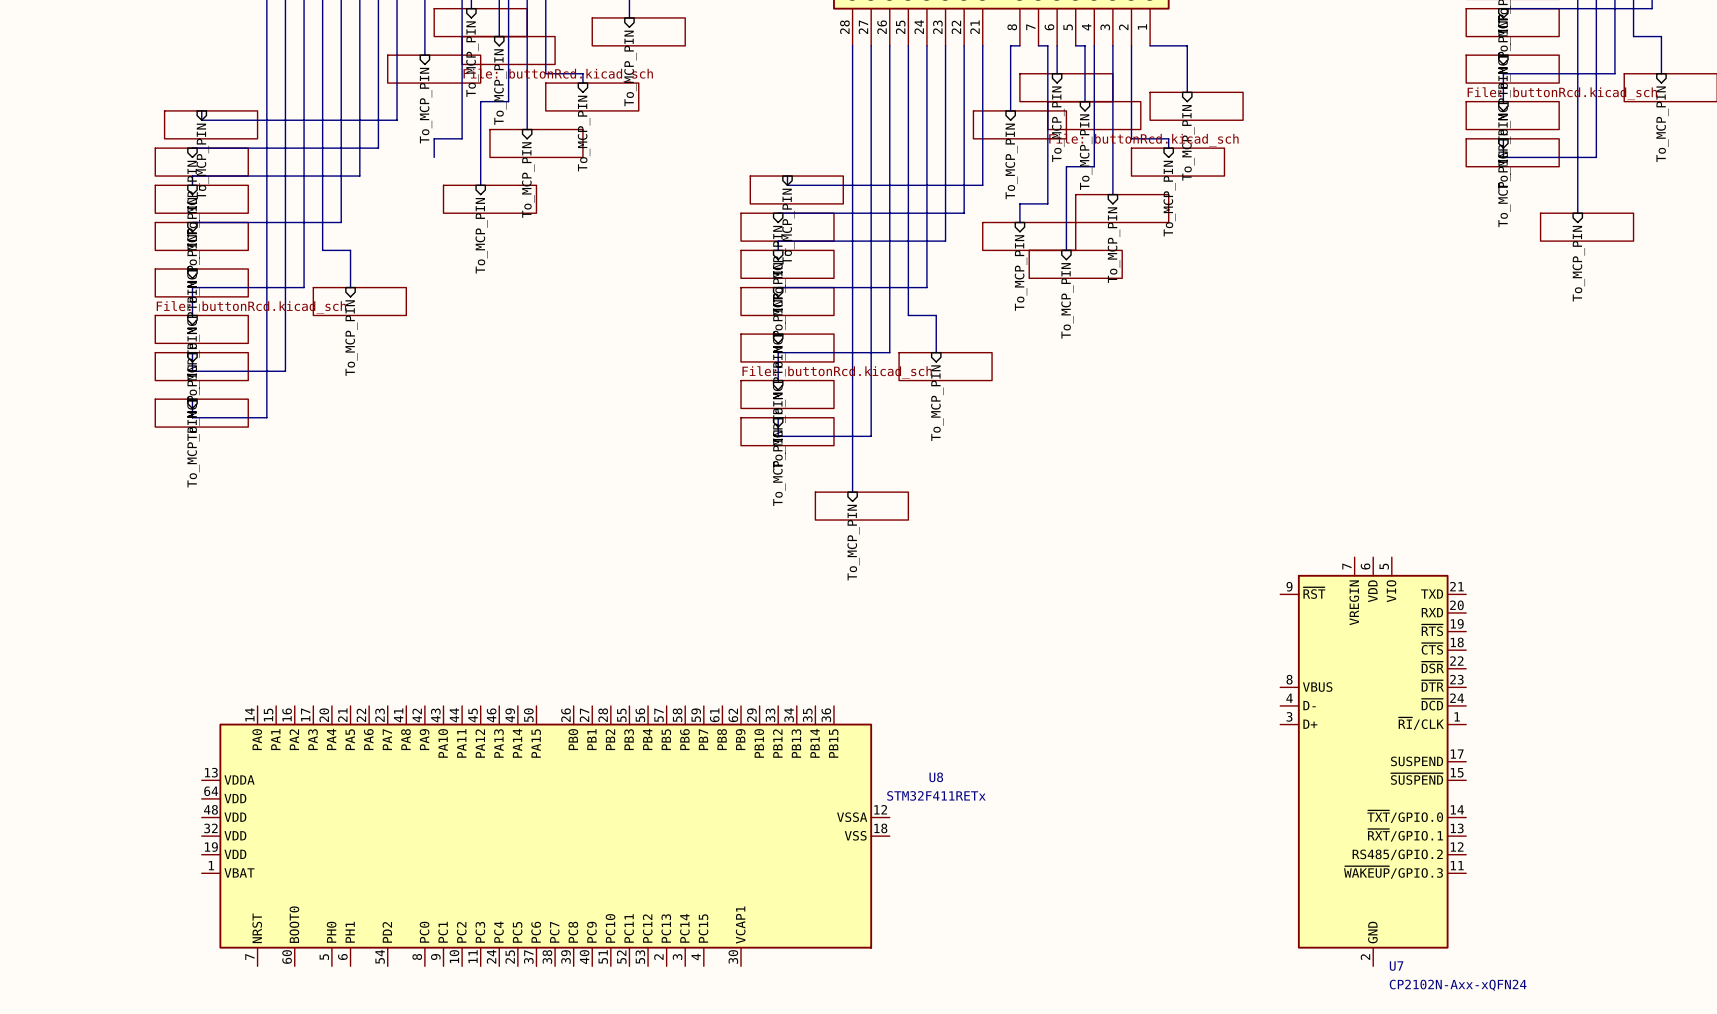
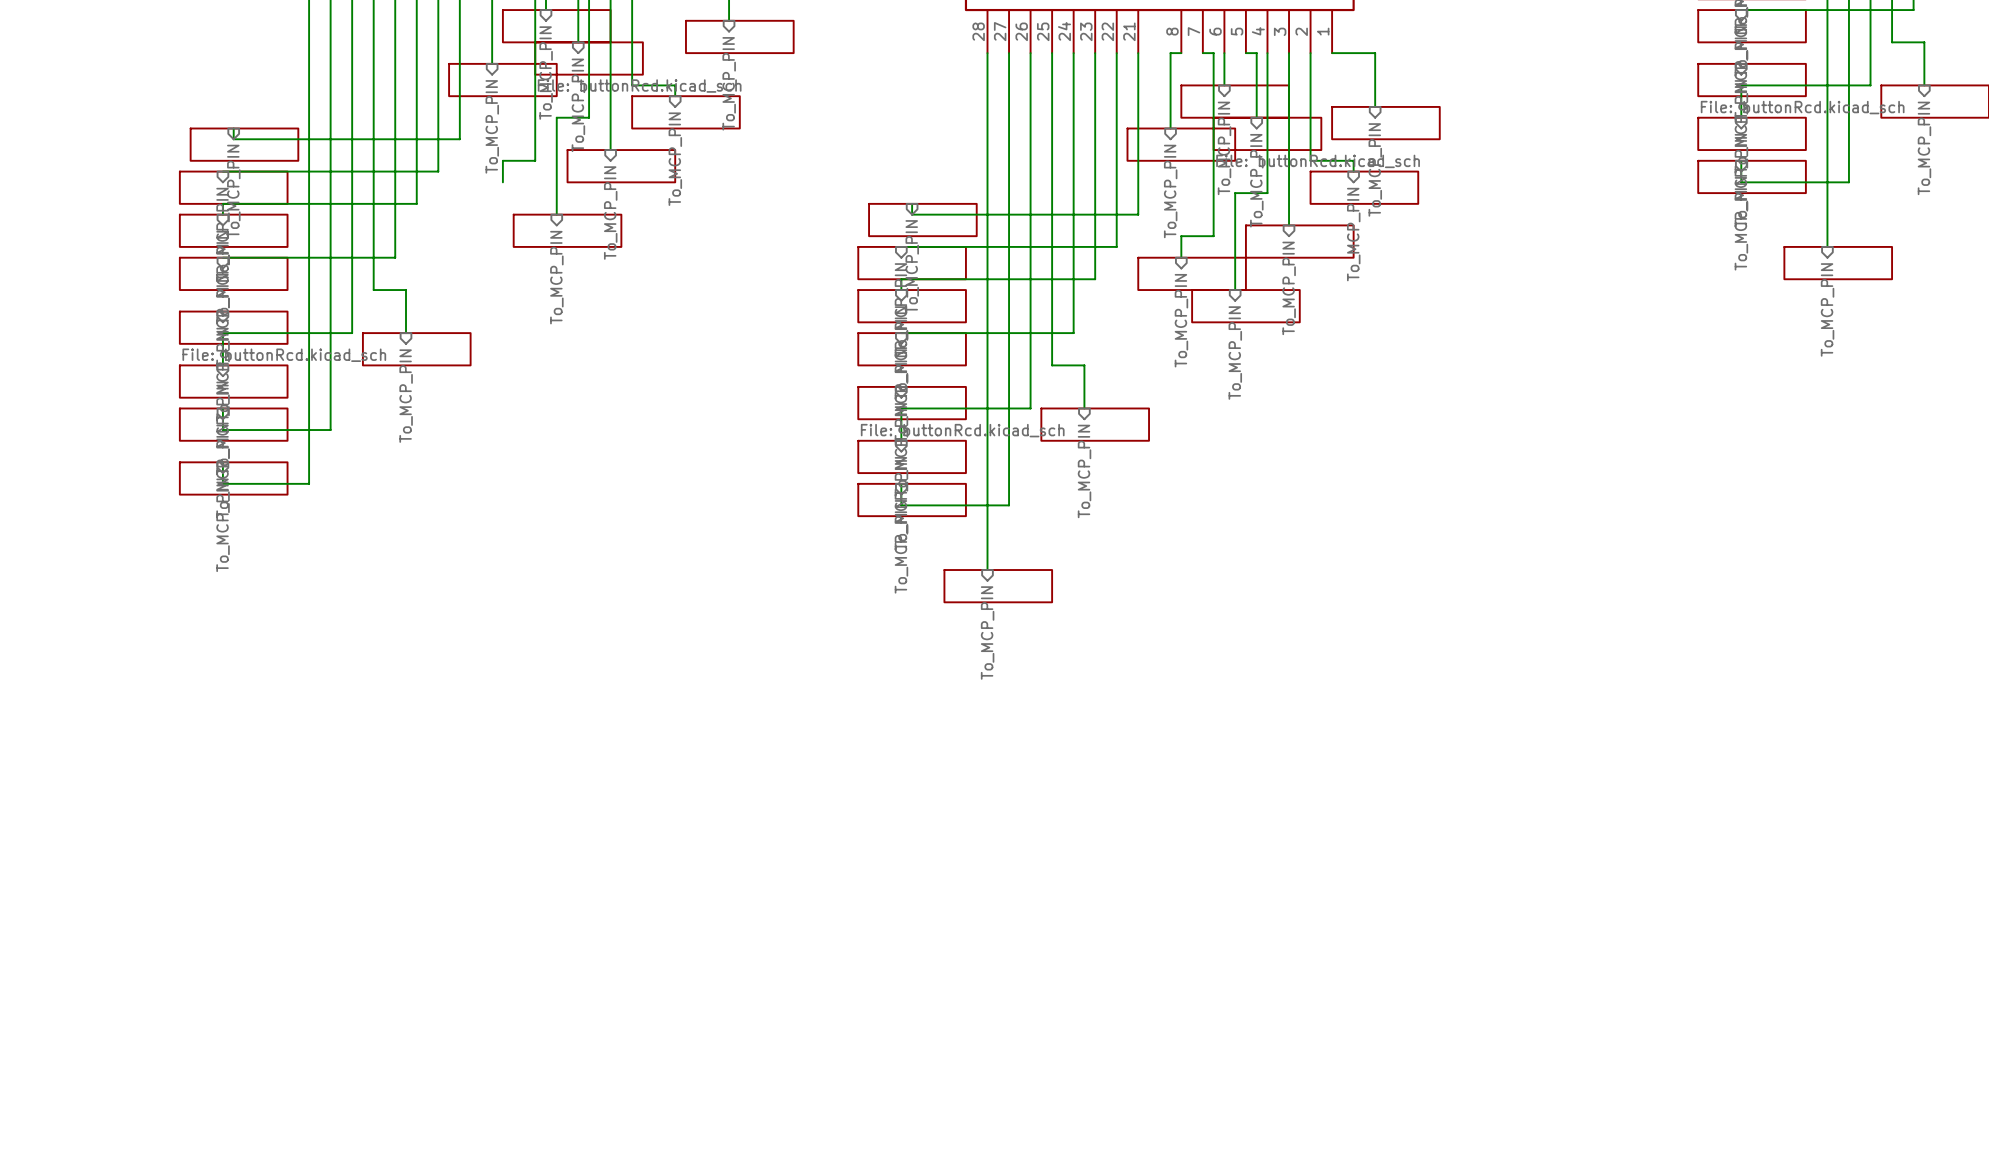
U7: CP2102N-Axx-xQFN24 (1373, 761) -> none
U8: STM32F411RETx (545, 836) -> none

